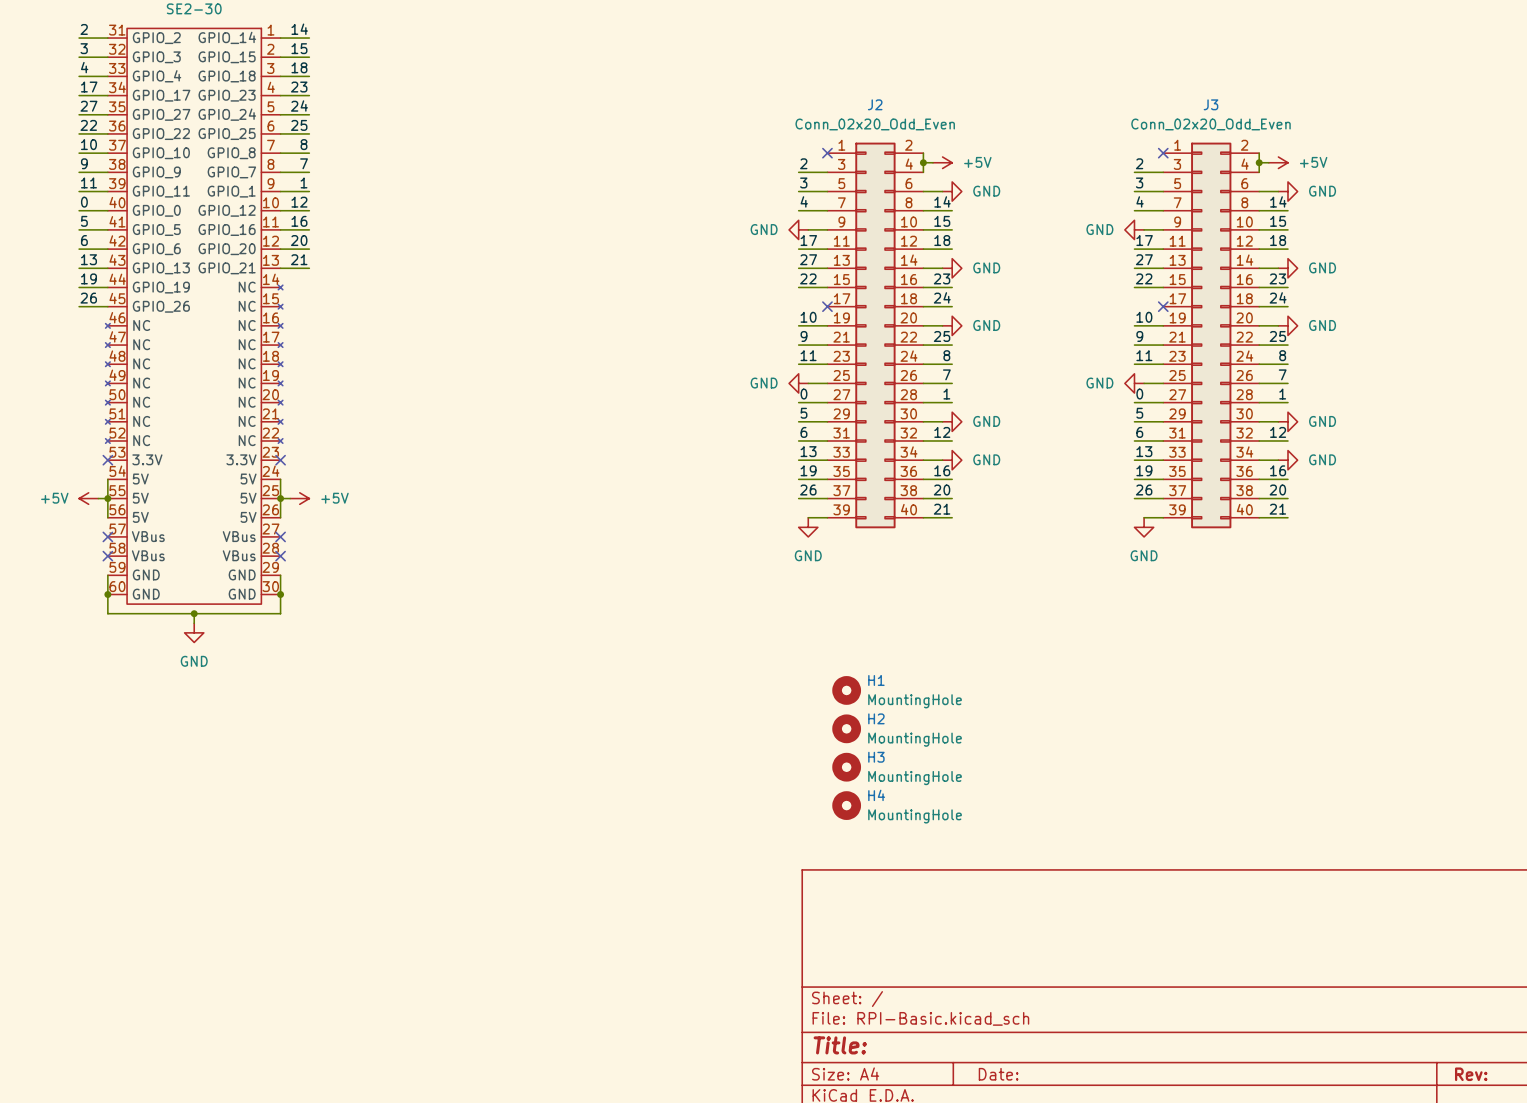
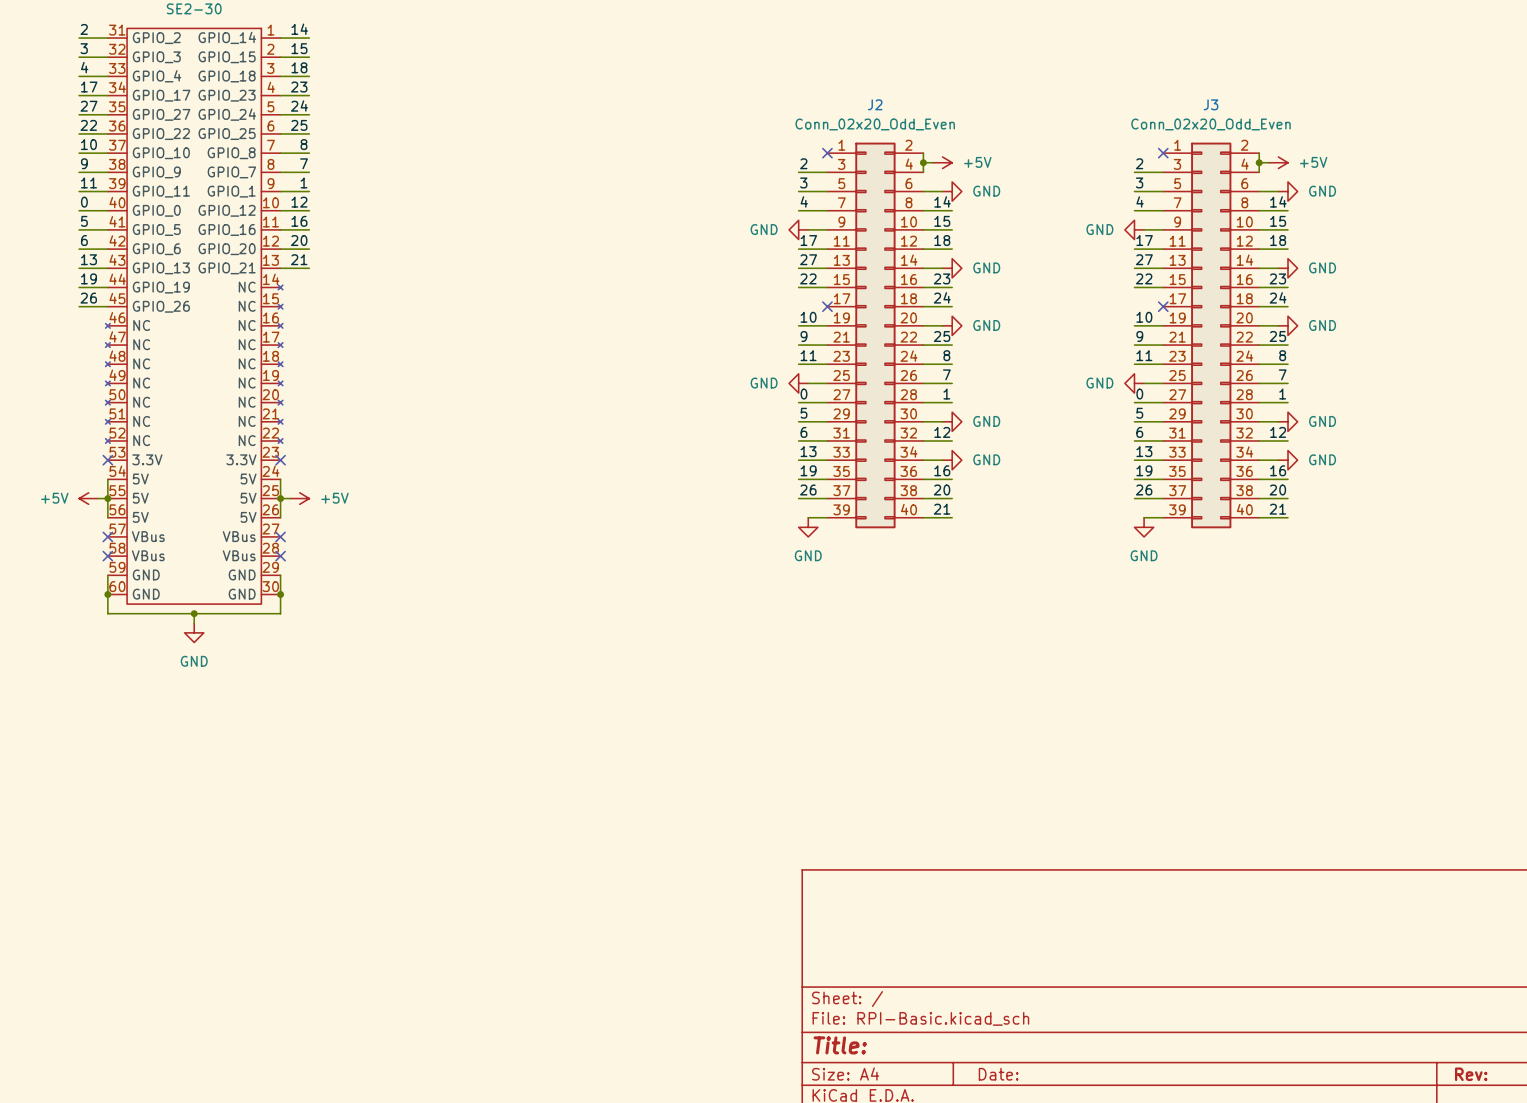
H1: MountingHole (846, 690) -> none
H2: MountingHole (846, 728) -> none
H3: MountingHole (846, 767) -> none
H4: MountingHole (846, 805) -> none

